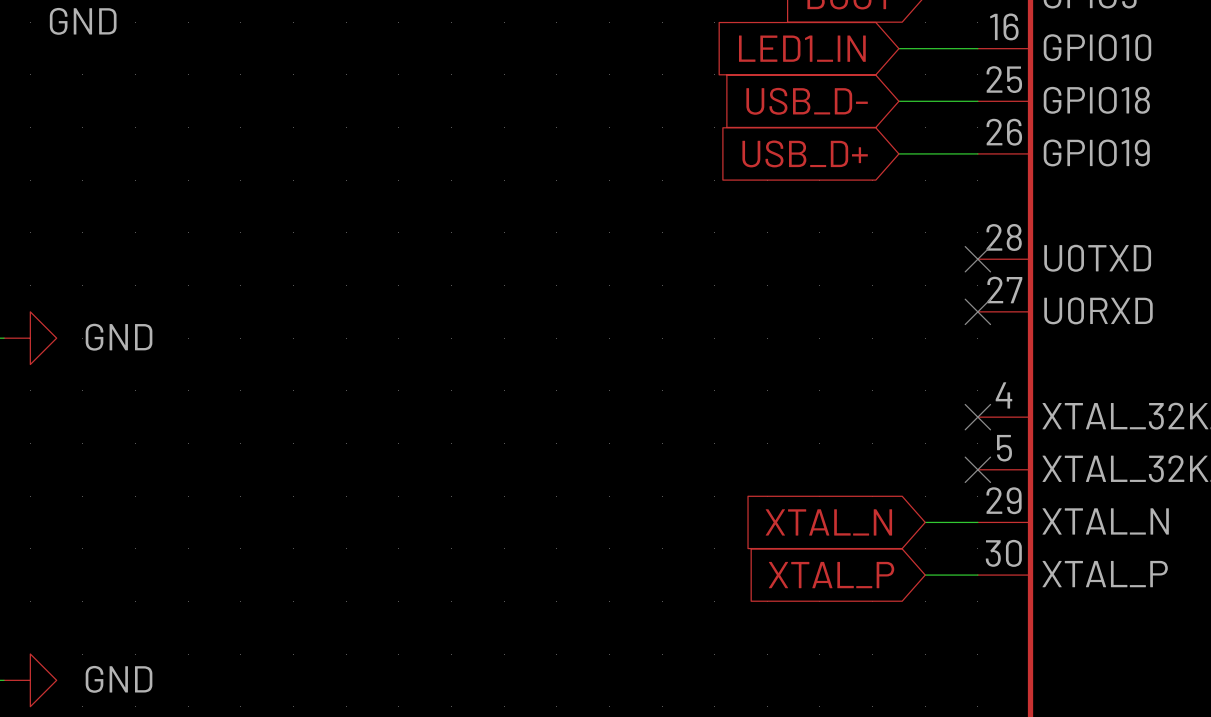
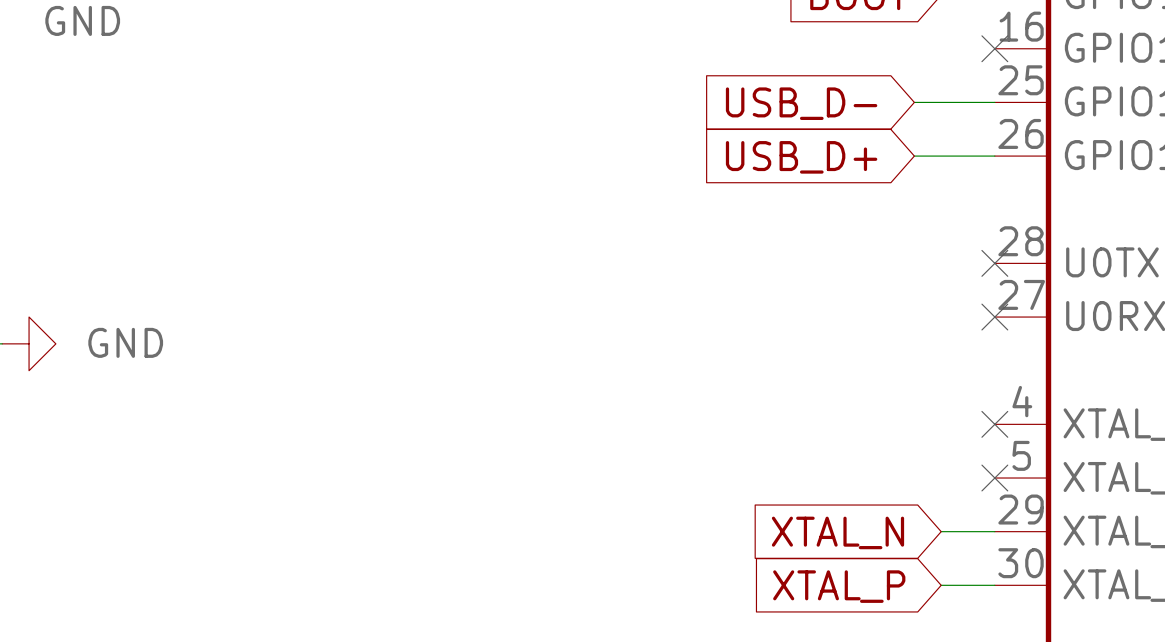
global label: LED1_IN (802, 48) -> none
wire: (898, 48) (977, 48) -> none
no-connect mark: none -> (994, 48)

